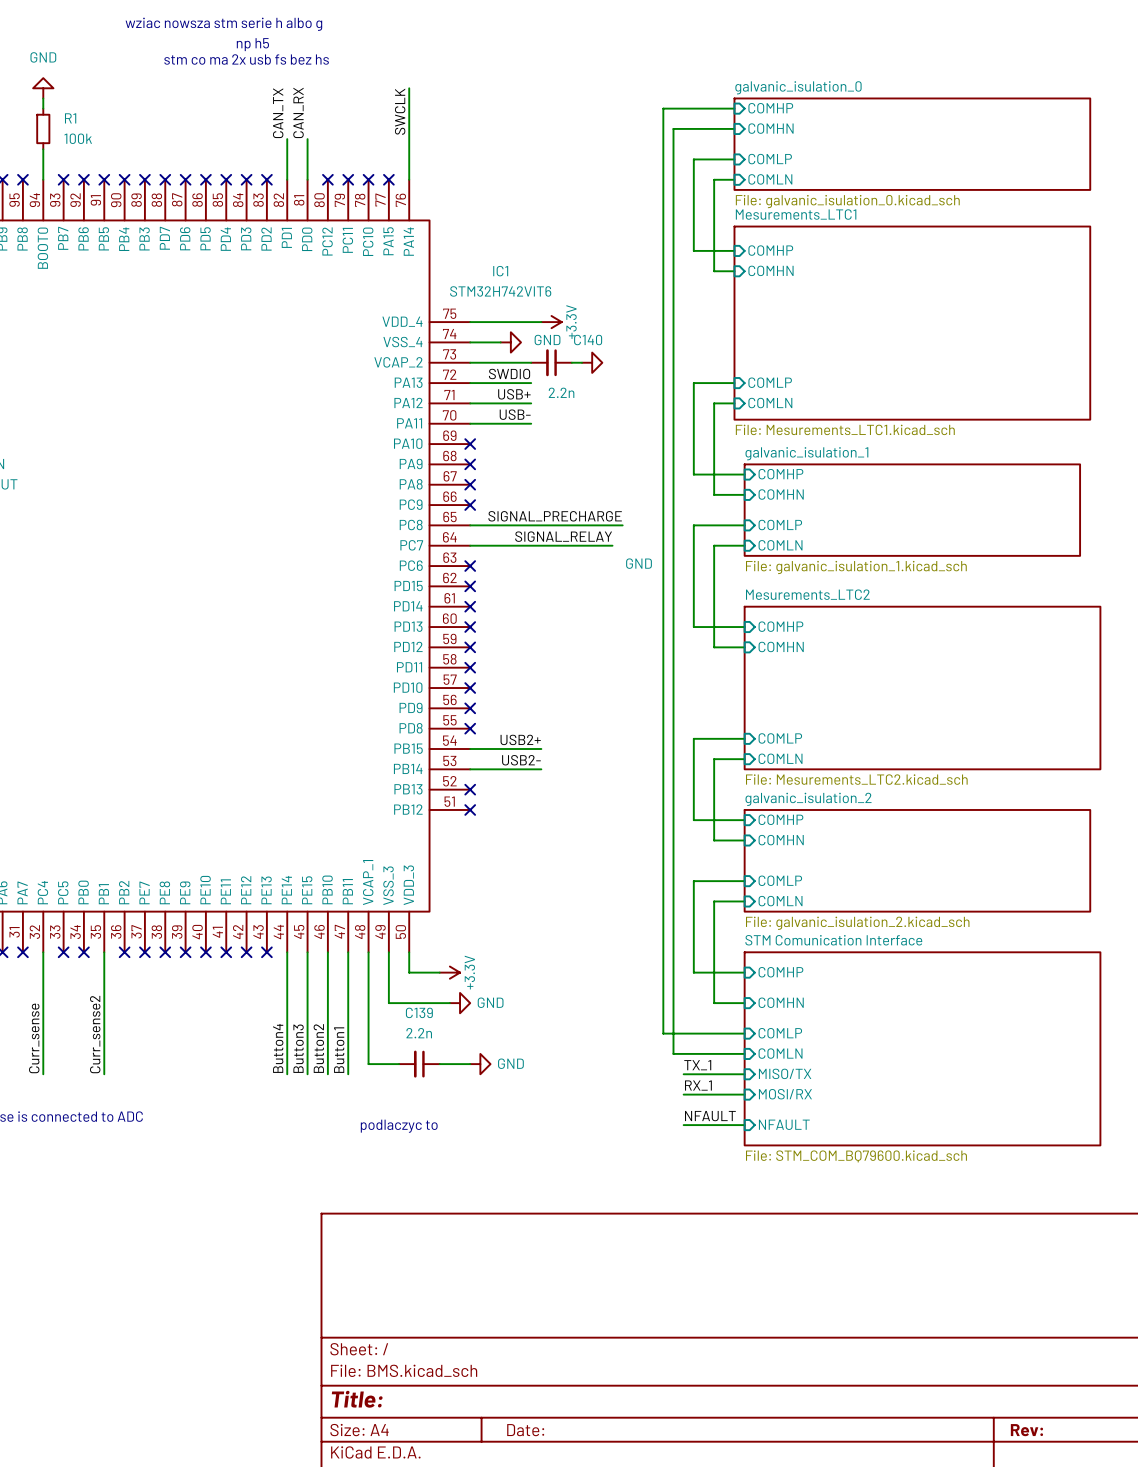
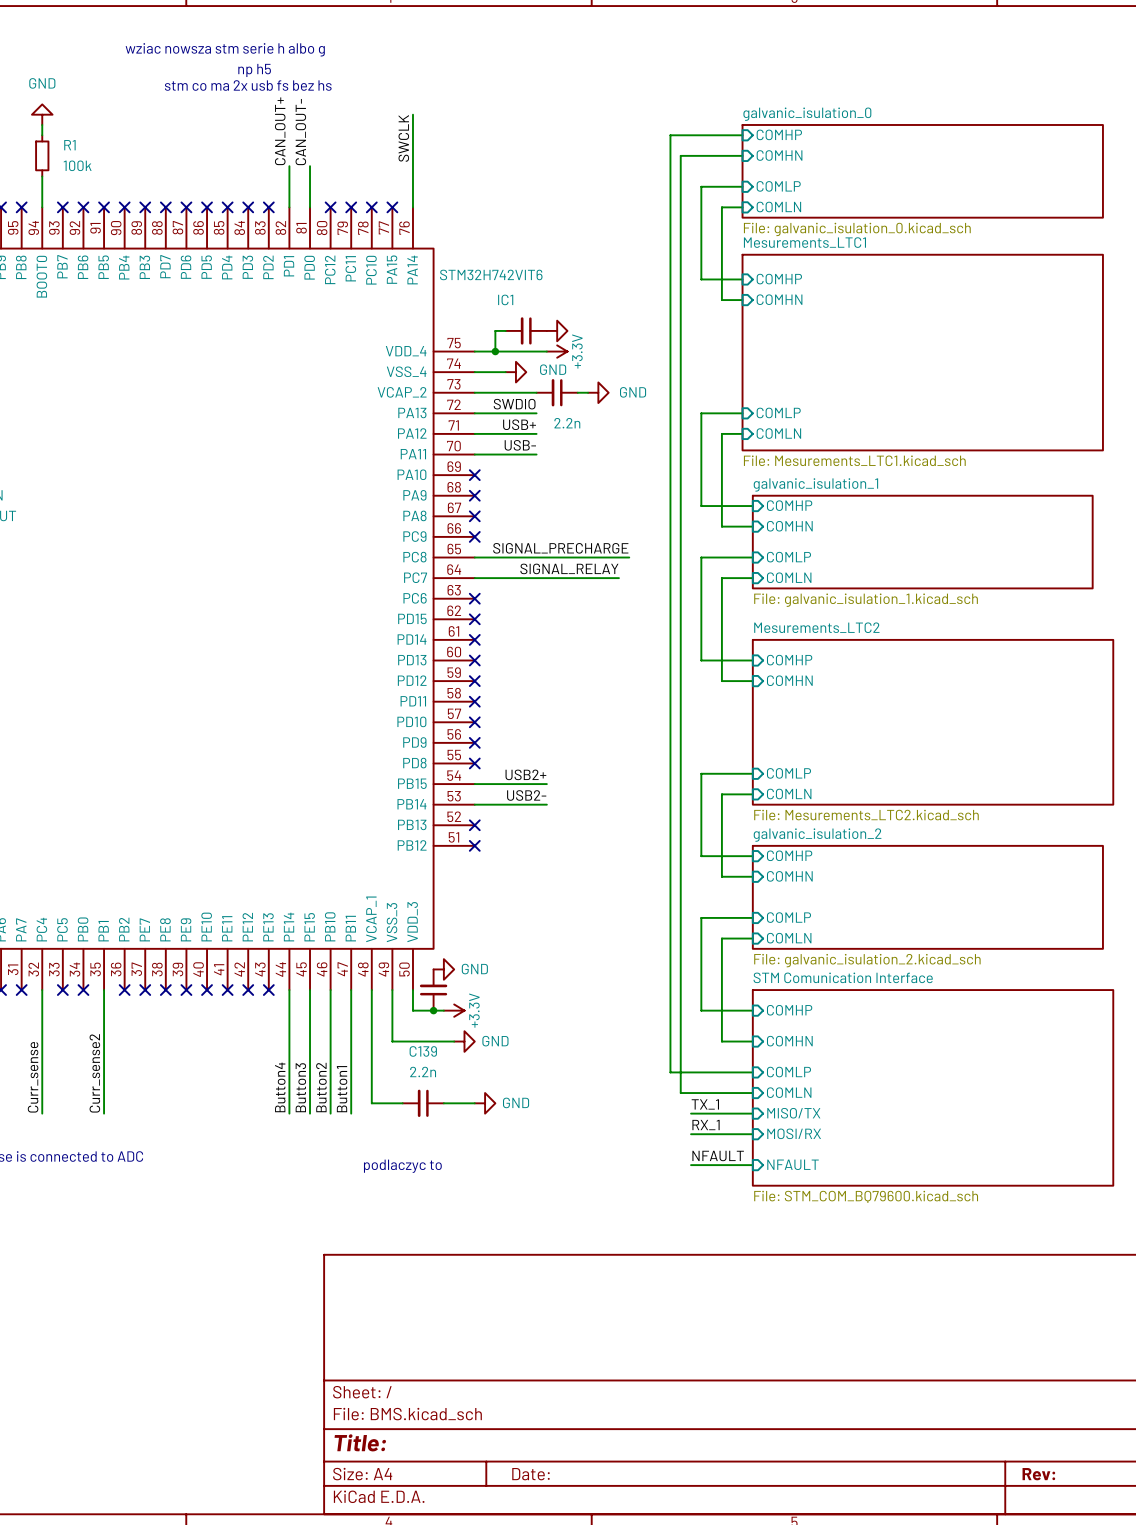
label: CAN_RX (298, 112) -> CAN_OUT- (300, 132)
label: CAN_TX (278, 113) -> CAN_OUT+ (280, 131)
IC1 value position: STM32H742VIT6 (500, 291) -> STM32H742VIT6 (491, 274)
wire: none -> (505, 330) (495, 330) (495, 351)
part: none -> (526, 330)
power symbol: none -> (557, 330)
junction: none -> (495, 351)
C140 name: C140 (588, 340) -> none
power symbol text position: GND (639, 563) -> GND (633, 392)
power symbol: none -> GND (443, 969)
part: none -> (433, 990)
junction: none -> (433, 1010)

